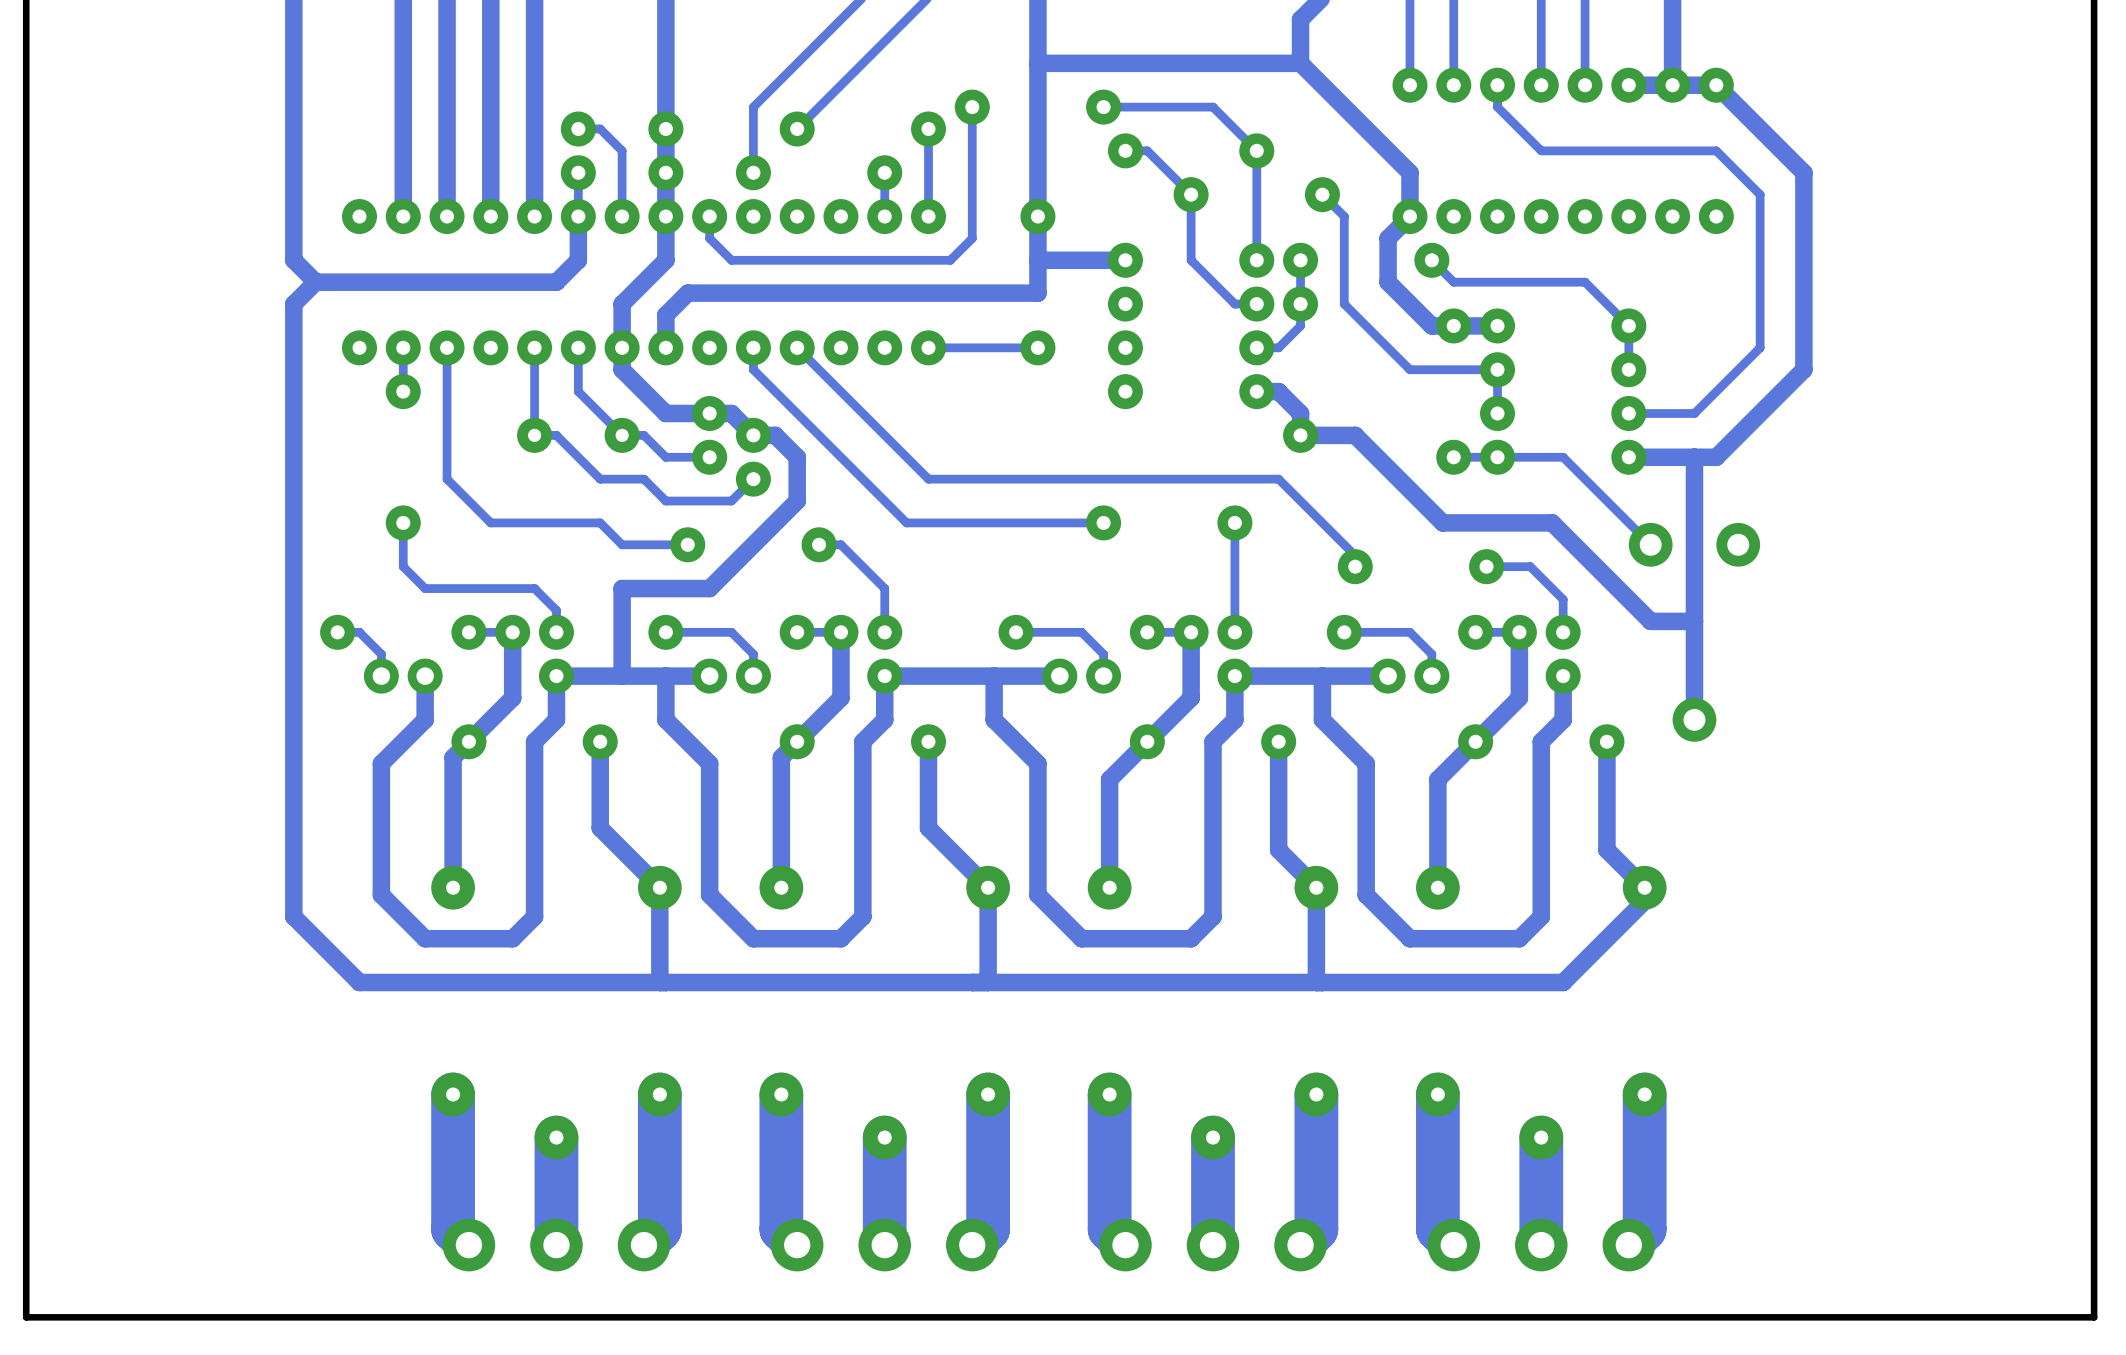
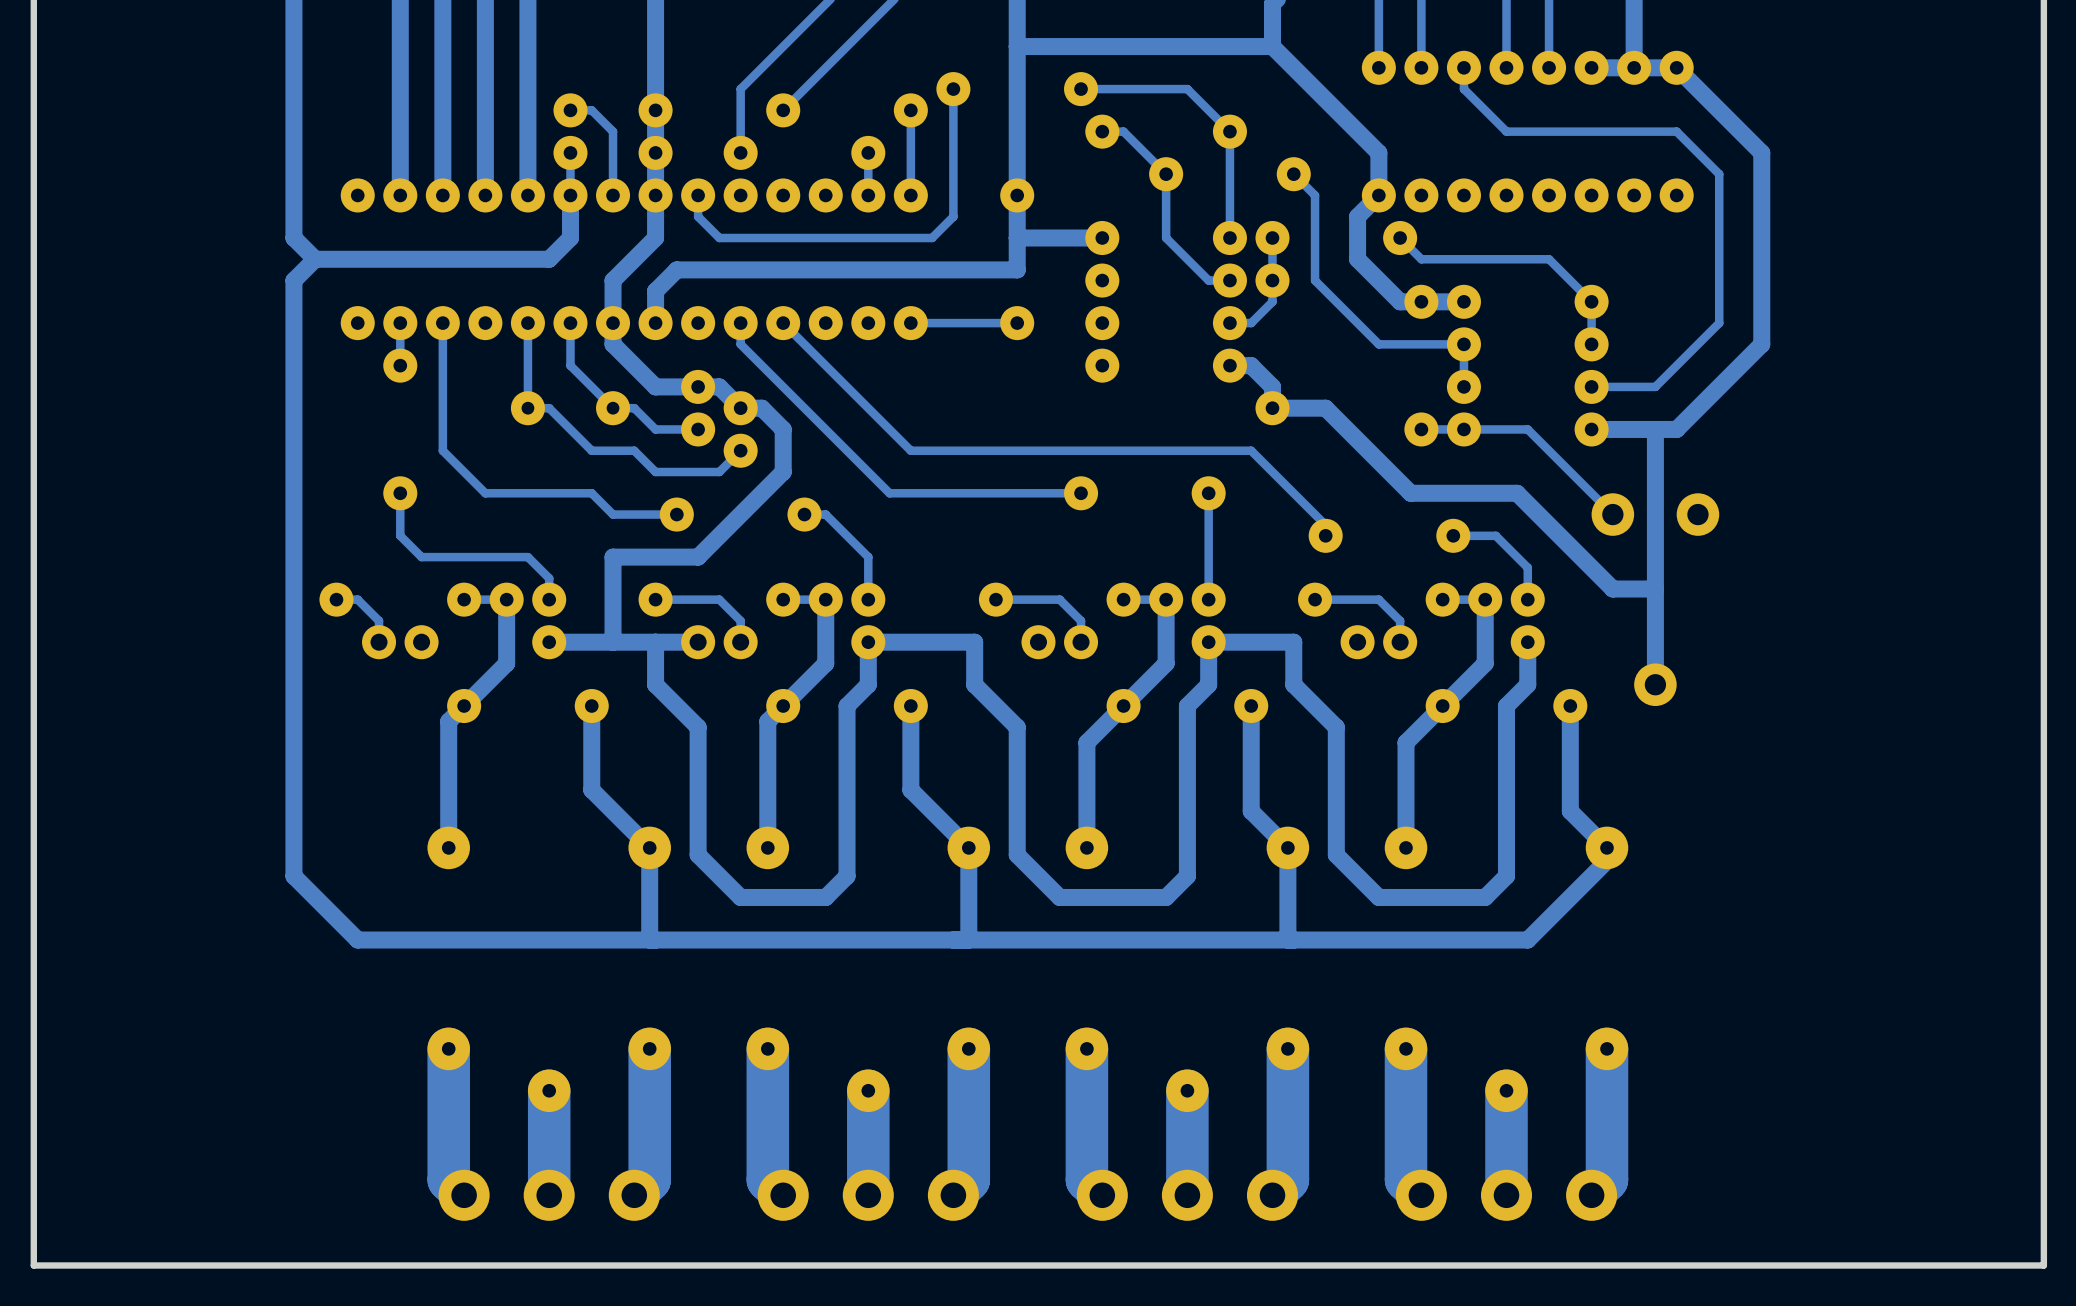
track: (556, 676) (556, 719) (534, 741) (534, 916) (512, 938) (425, 938) (381, 894) (381, 763) (425, 719) (425, 676) -> none
track: (1059, 676) (994, 676) -> none
track: (1388, 676) (1322, 676) -> none

